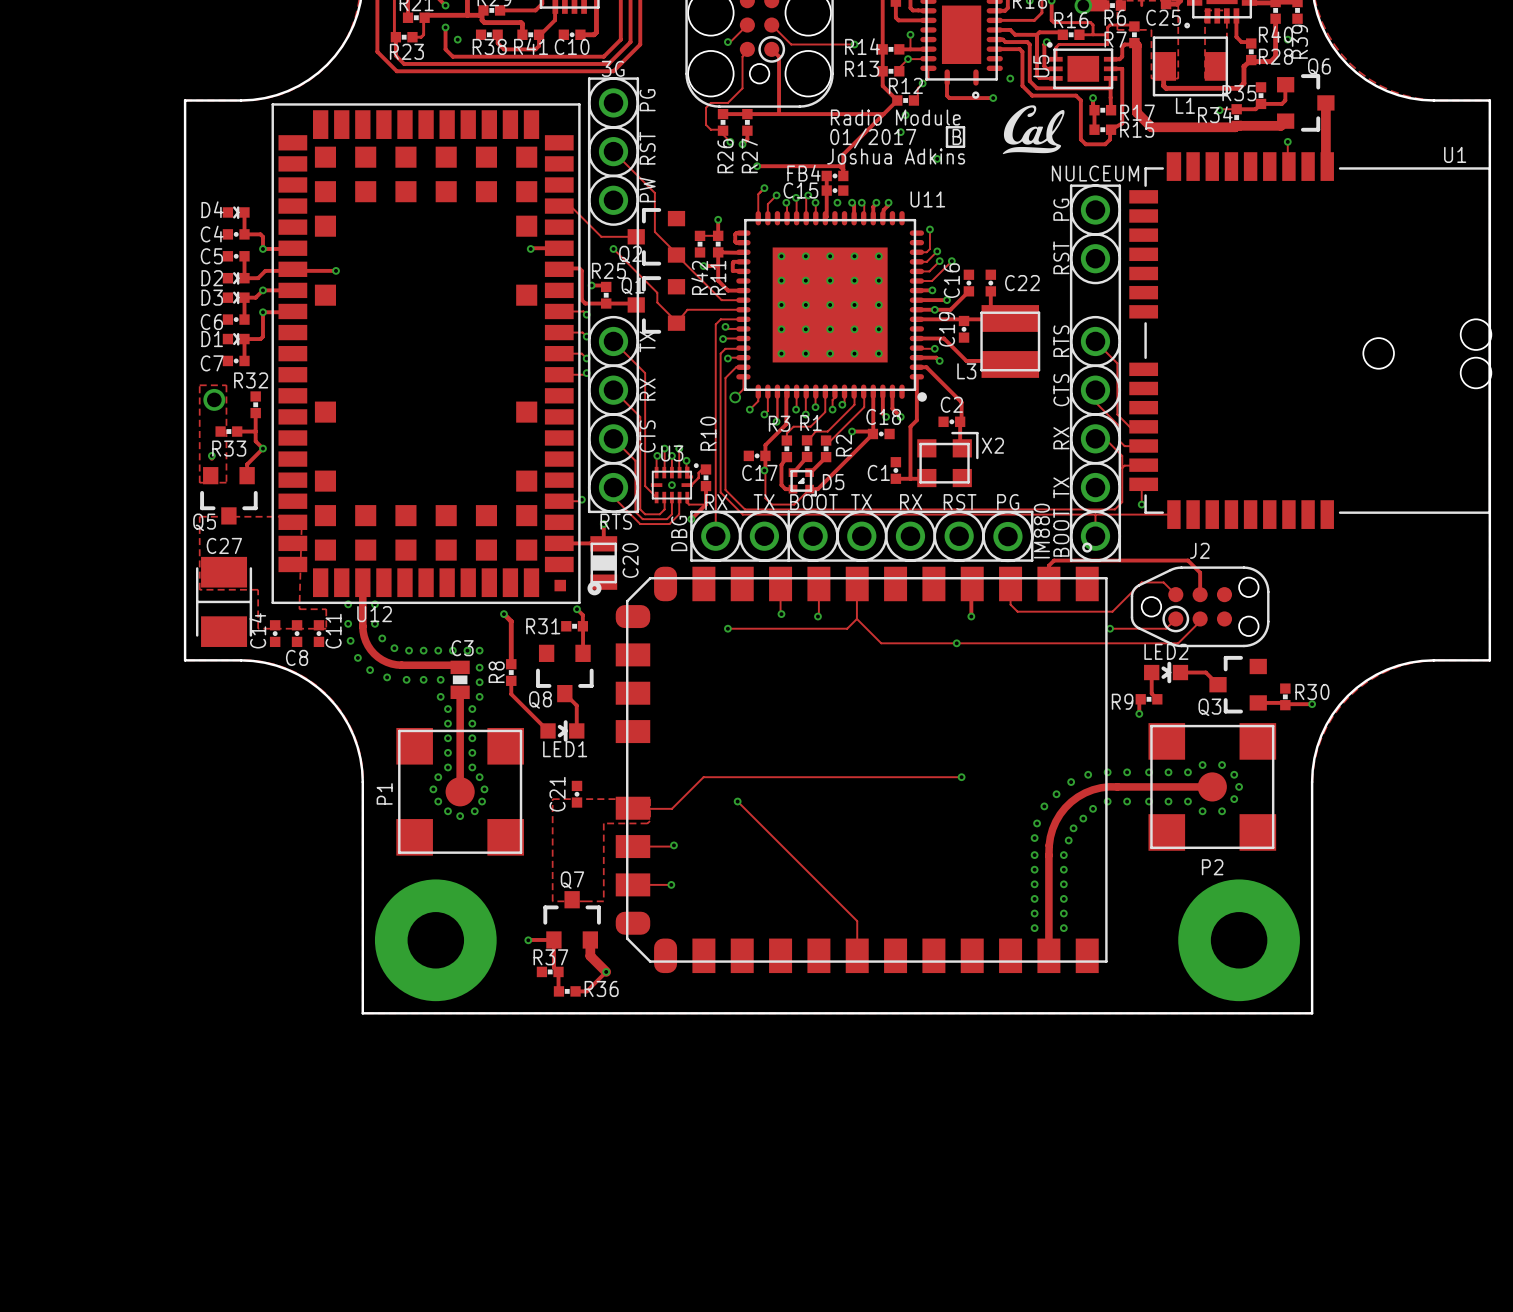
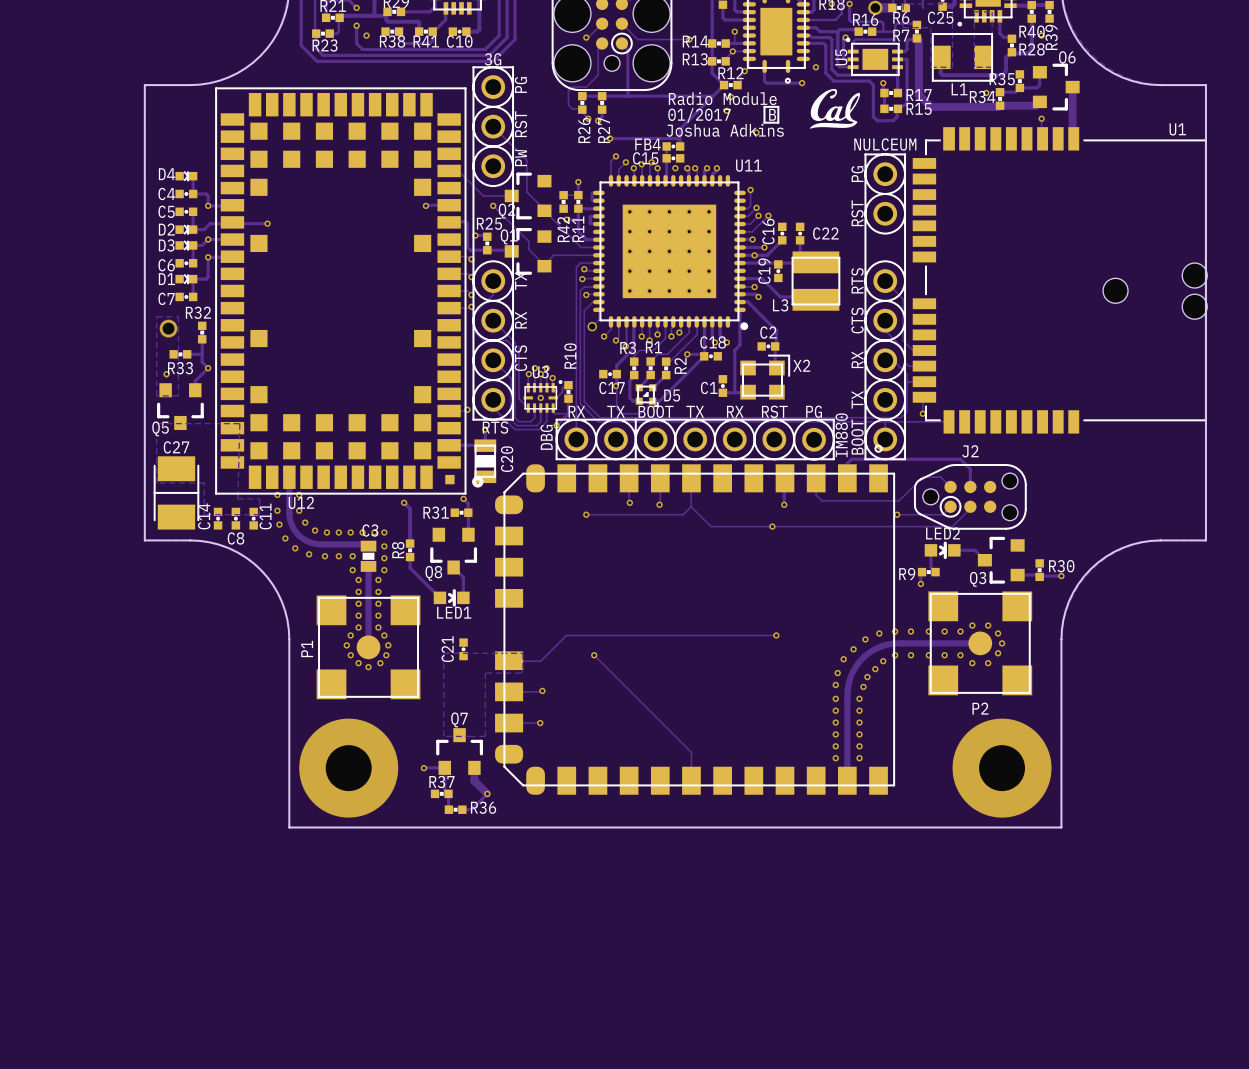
track: (613, 341) (645, 373) (645, 421) -> (493, 281) (493, 294) (473, 314) (473, 330) (483, 340) (507, 340) (515, 348)

